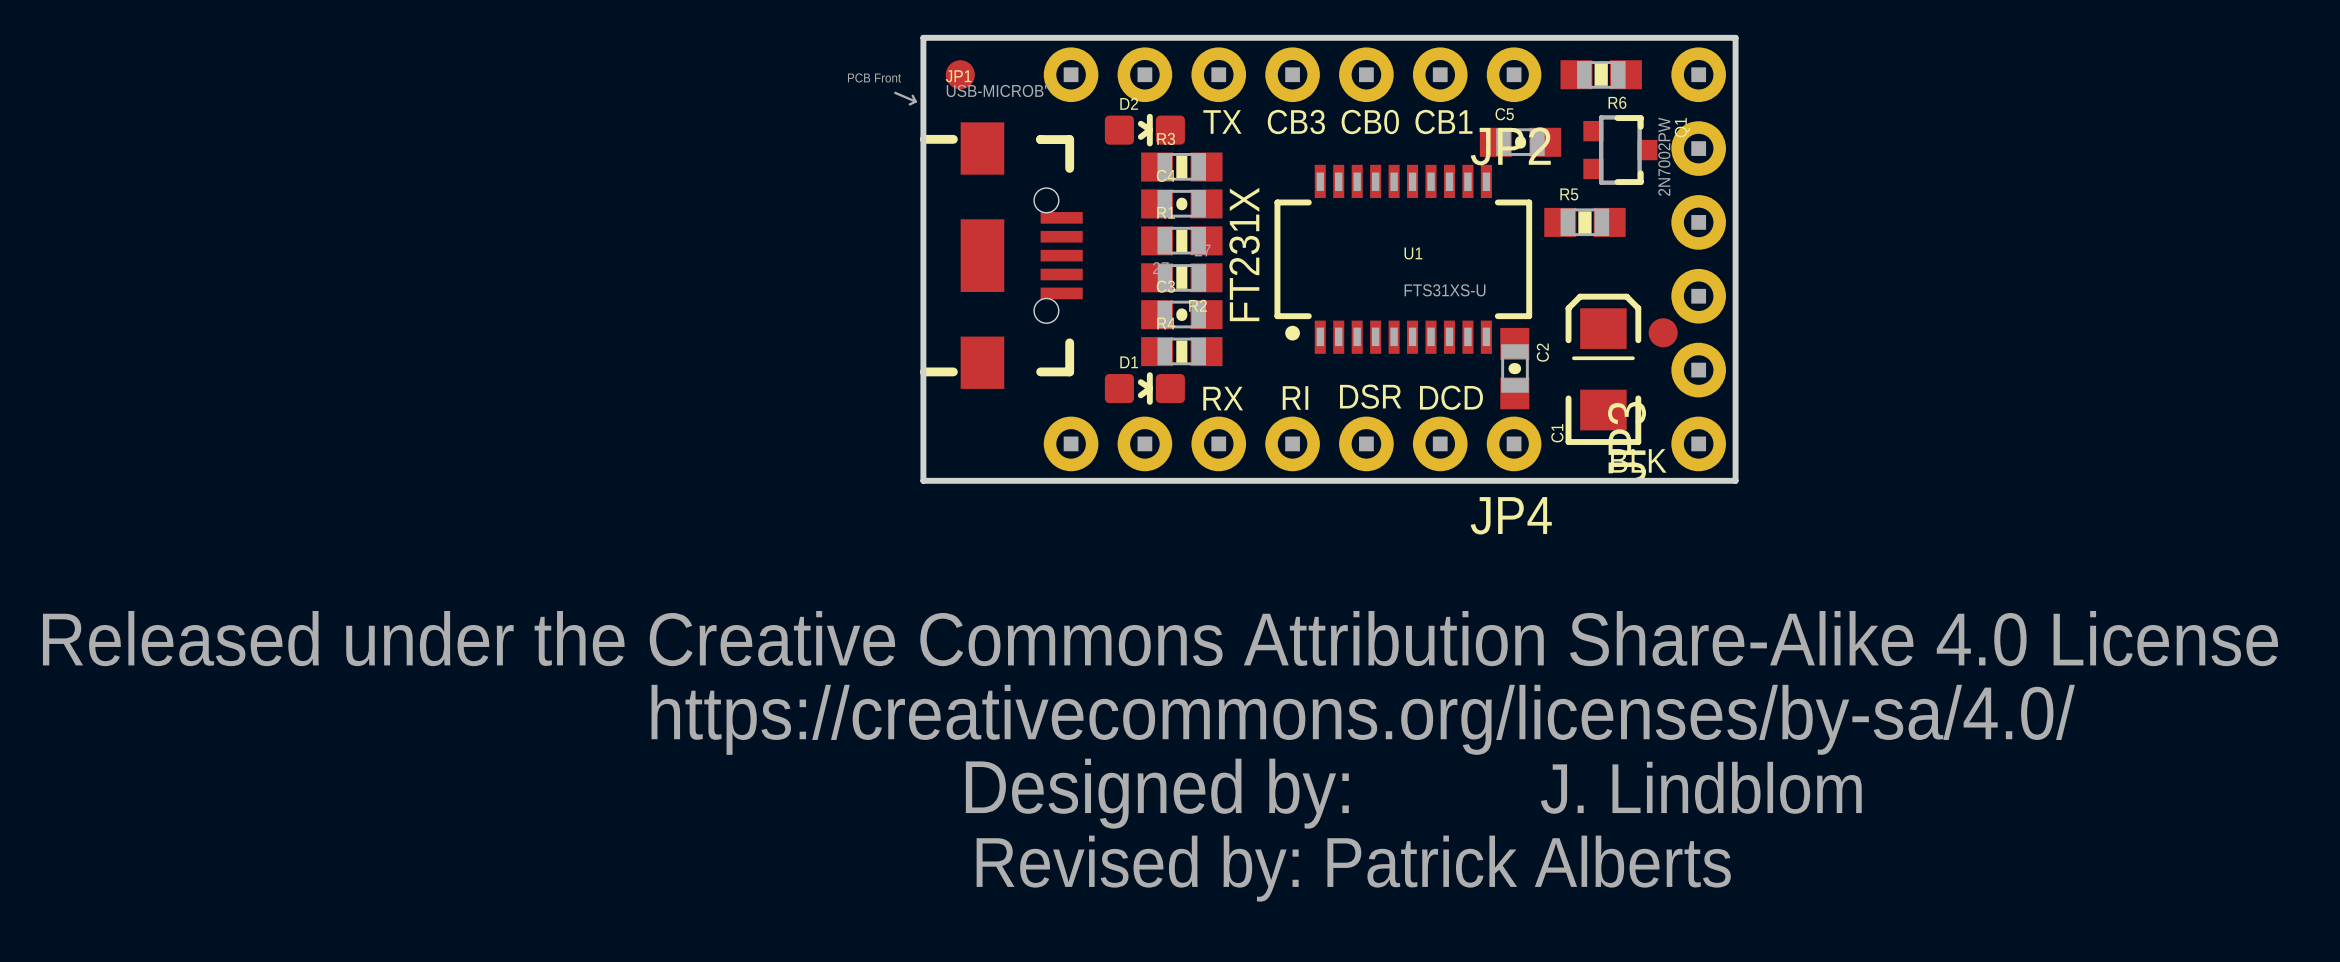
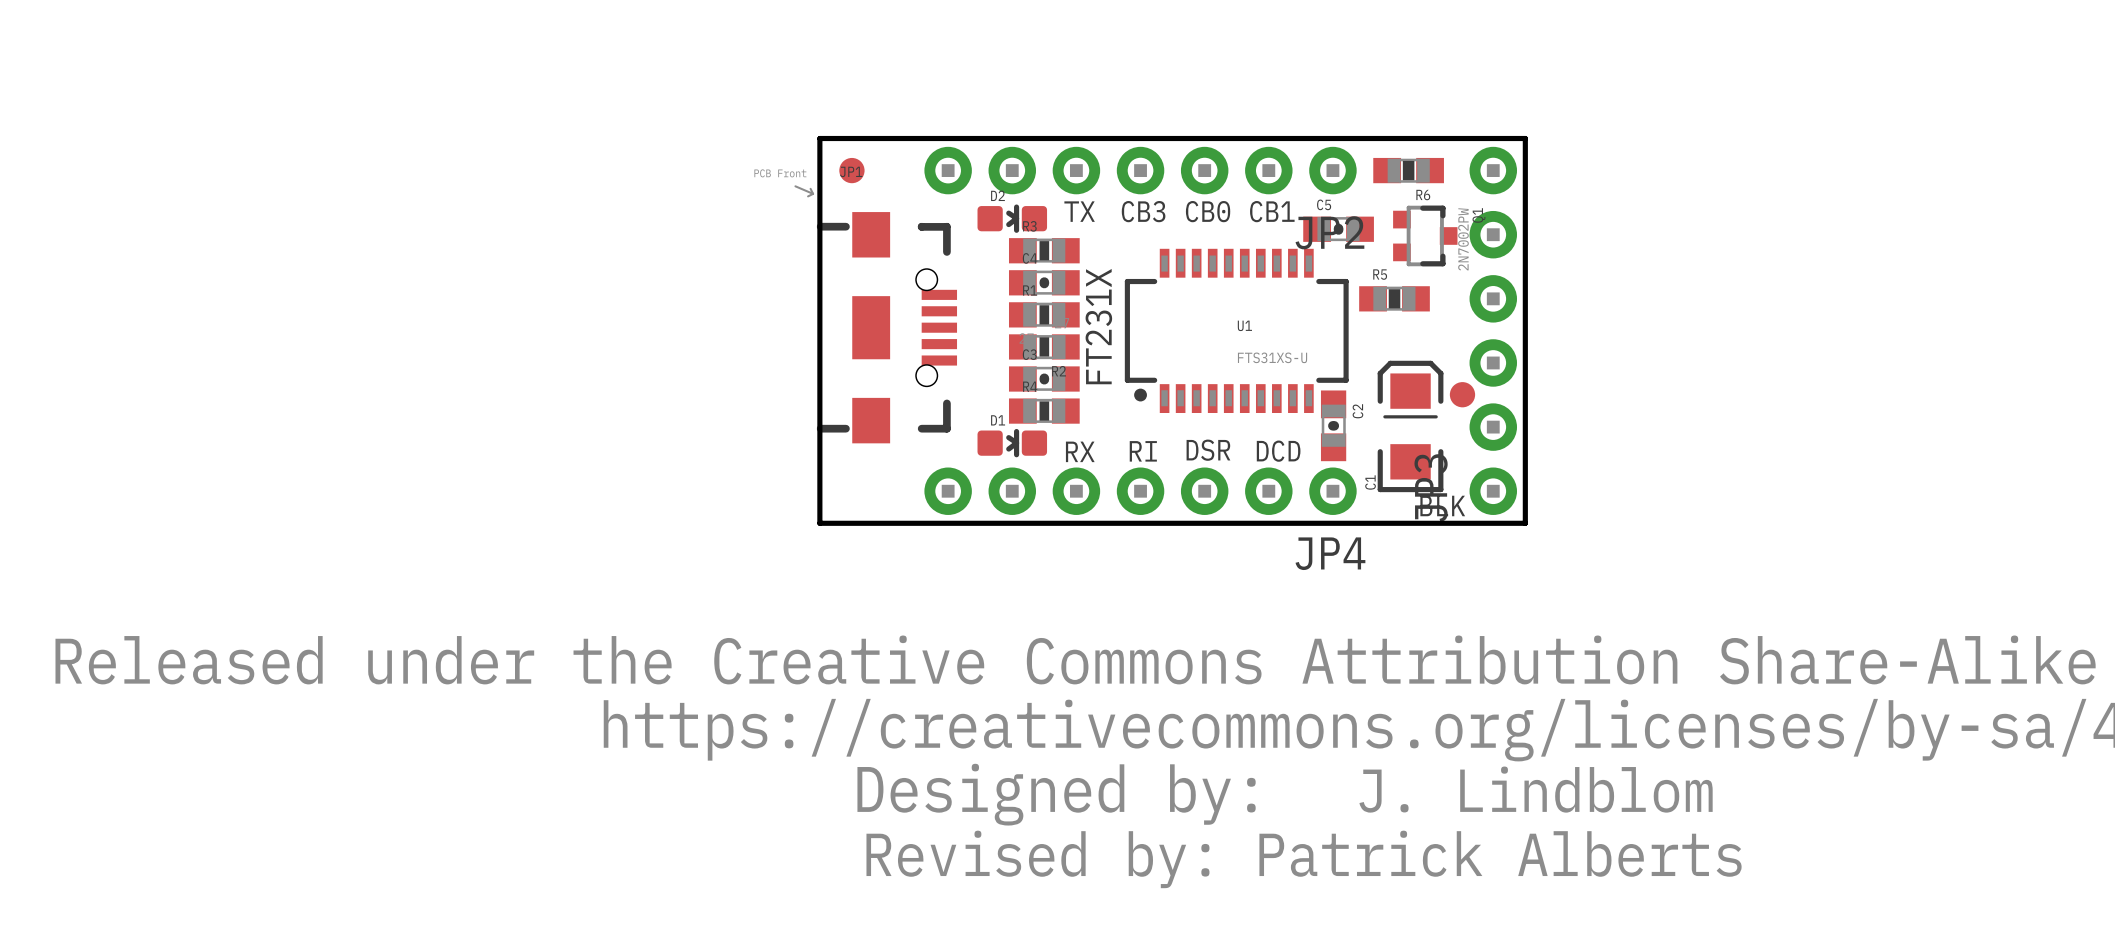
JP1 footprint: [894, 52, 1083, 389] -> [794, 185, 958, 444]
JP1 value: USB-MICROB" (997, 90) -> none

